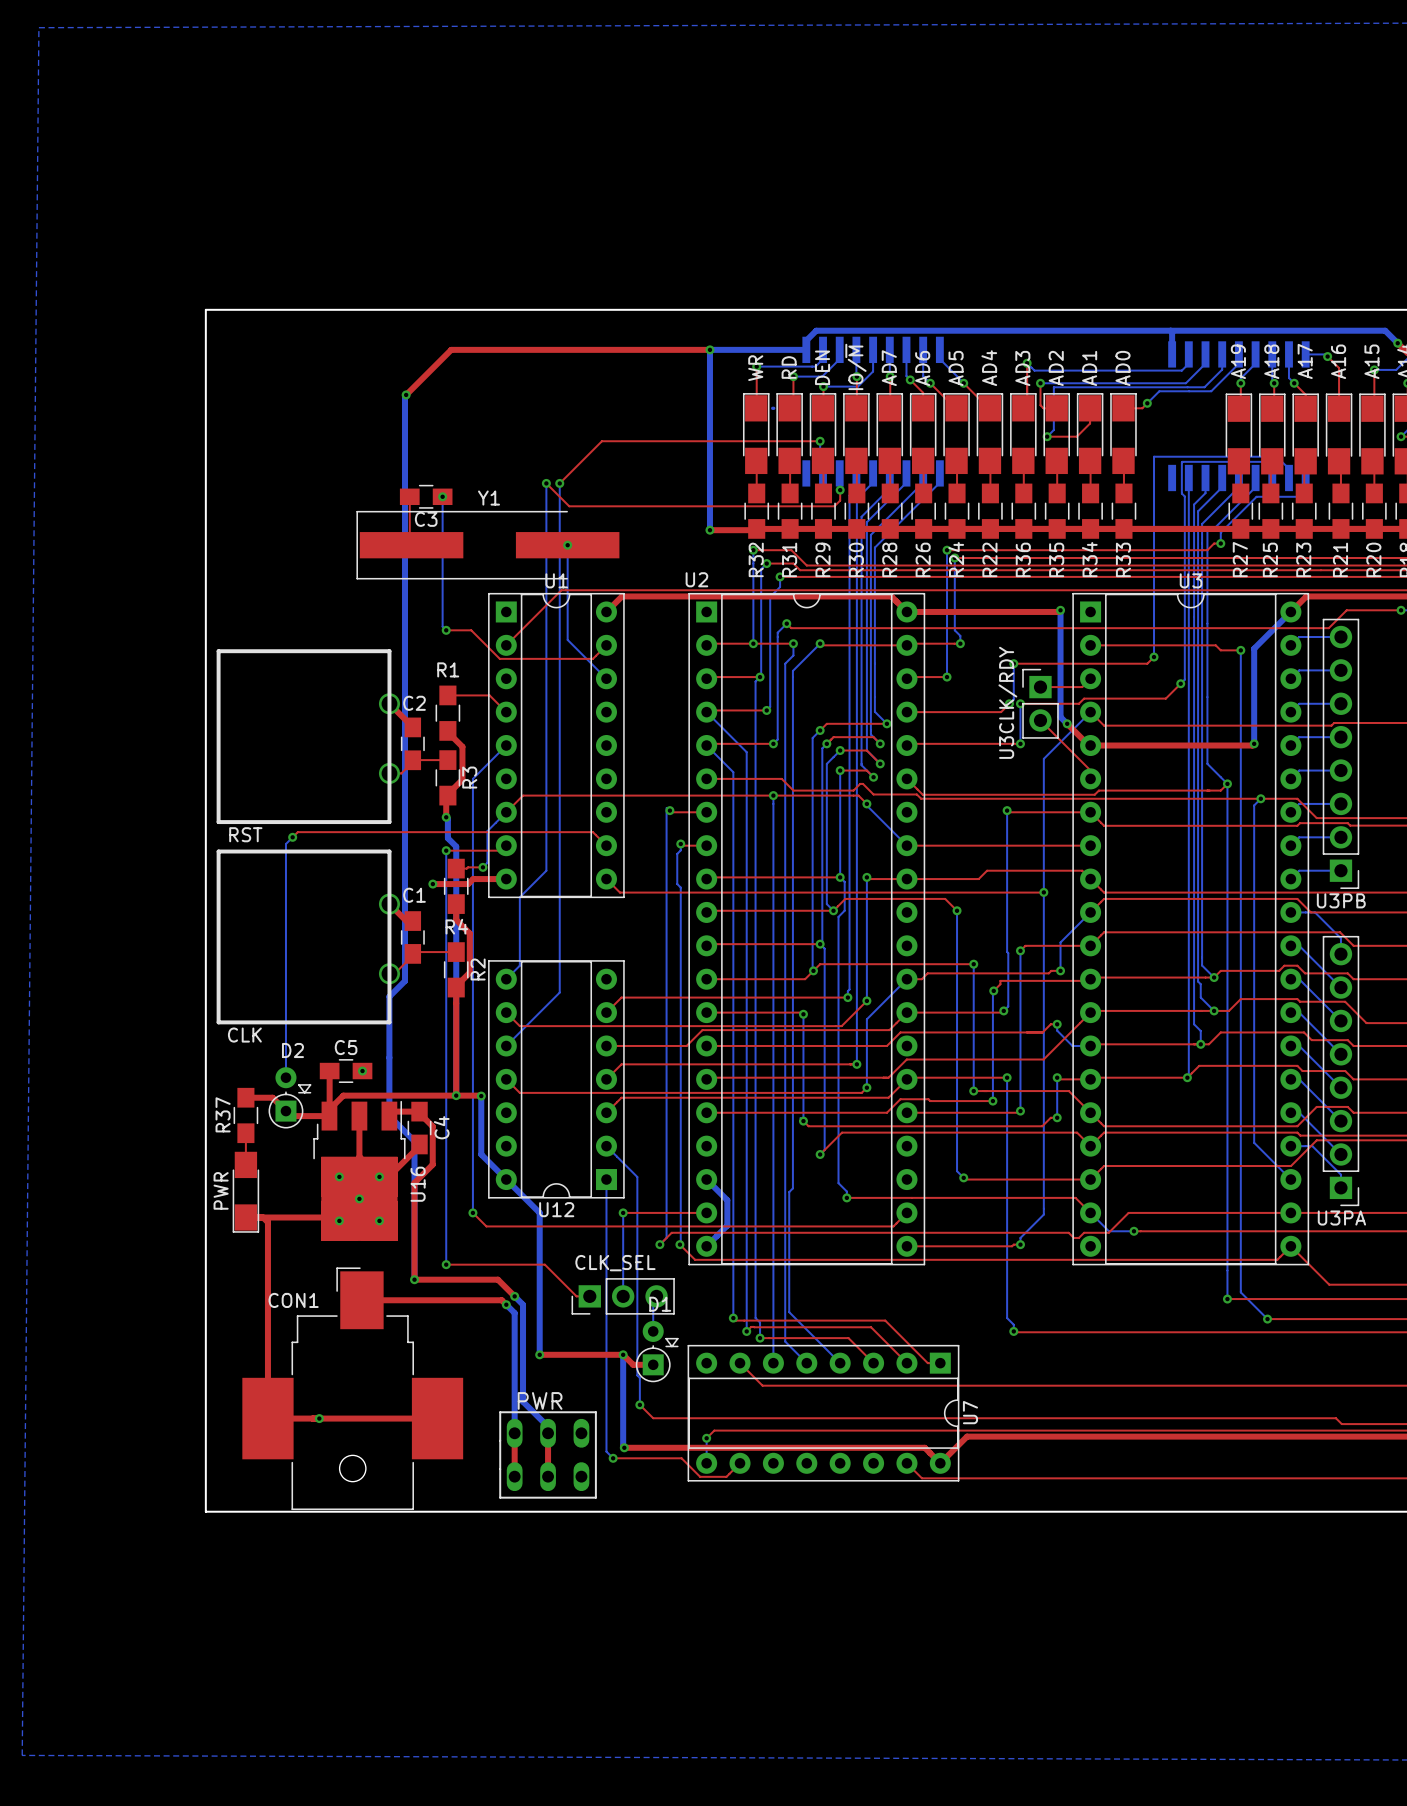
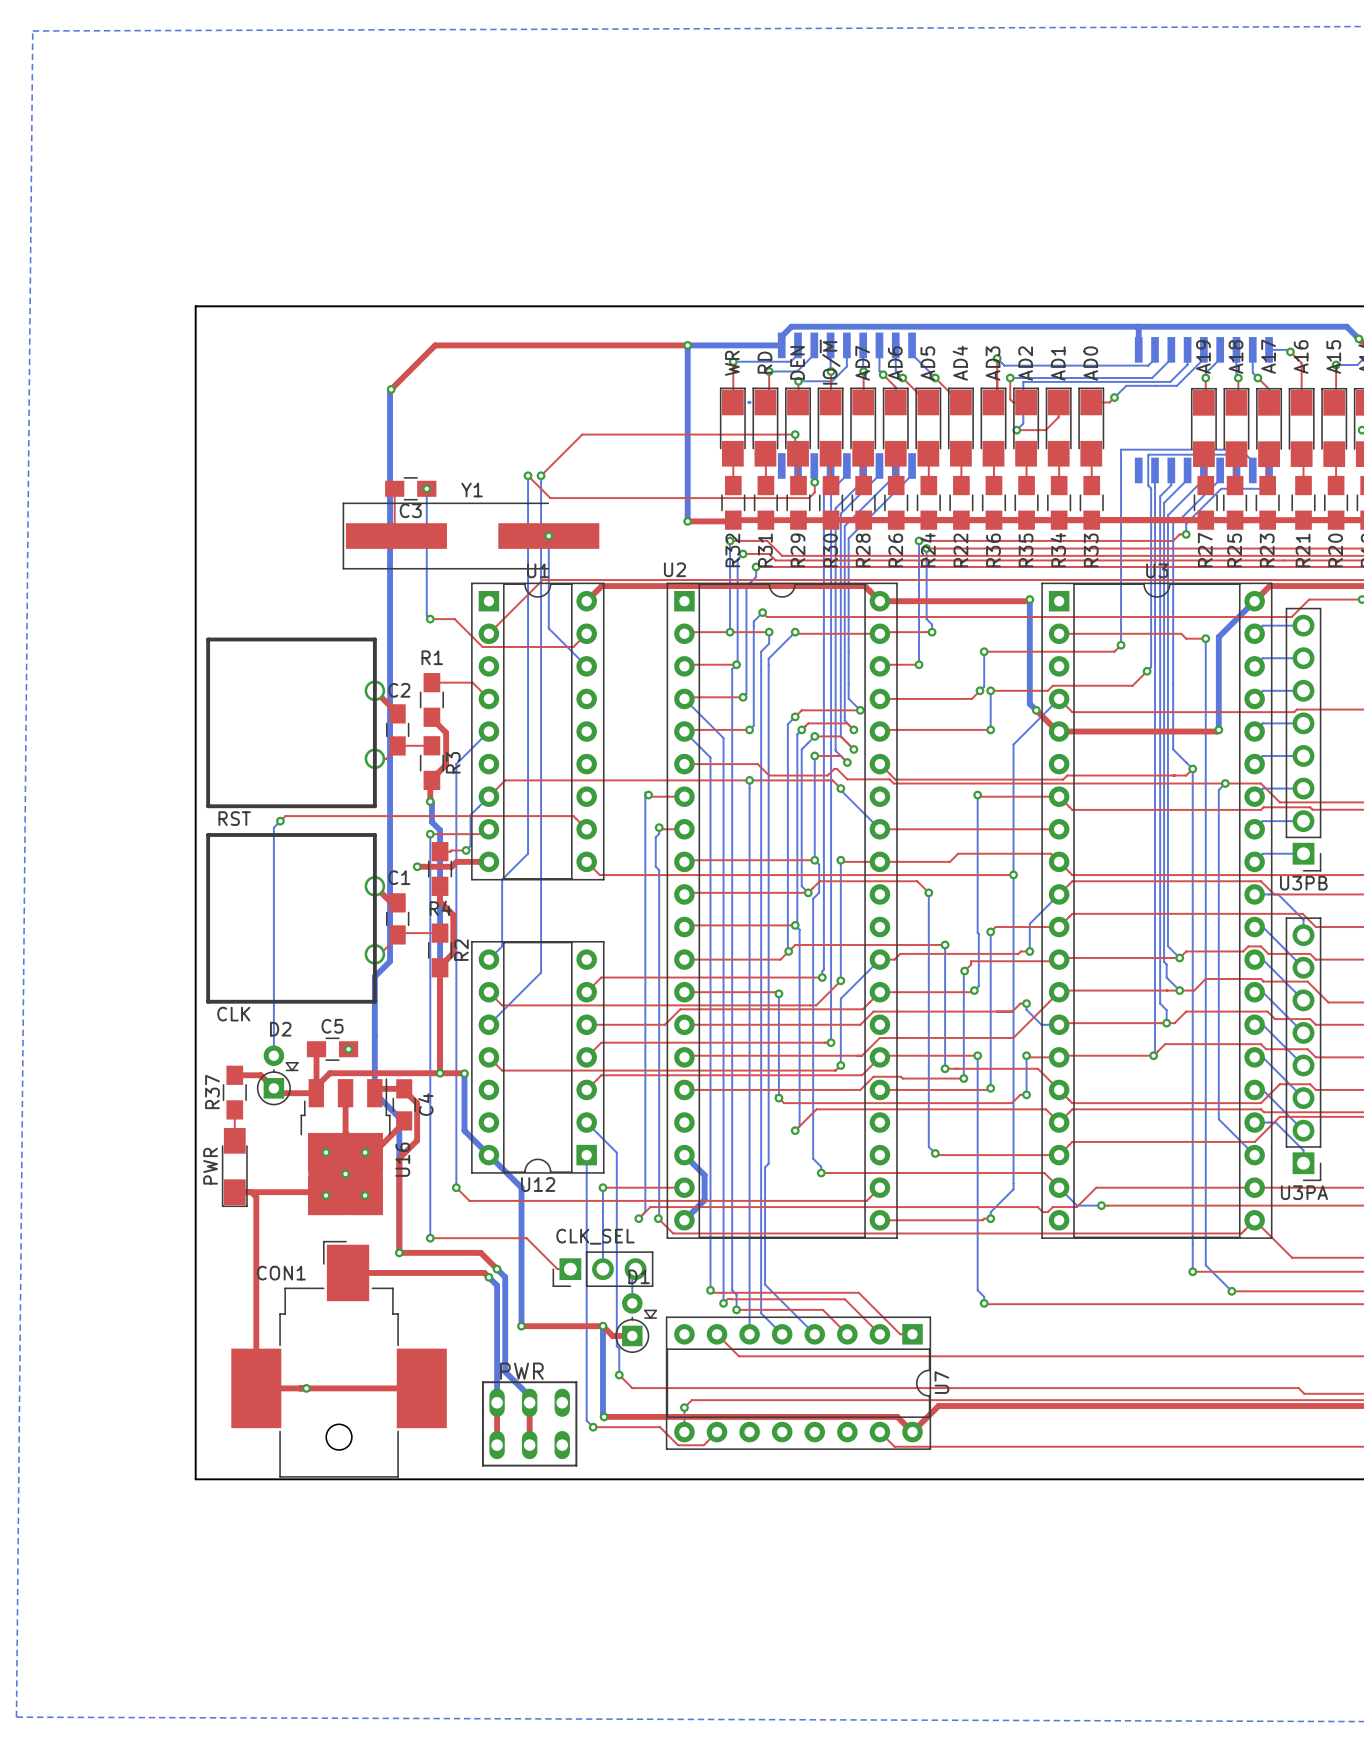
top track: (1090, 678) (1082, 687) (1040, 687) -> none
U3CLK/RDY: (1040, 703) -> none
top track: (1040, 720) (1090, 770) (1090, 778) -> none

